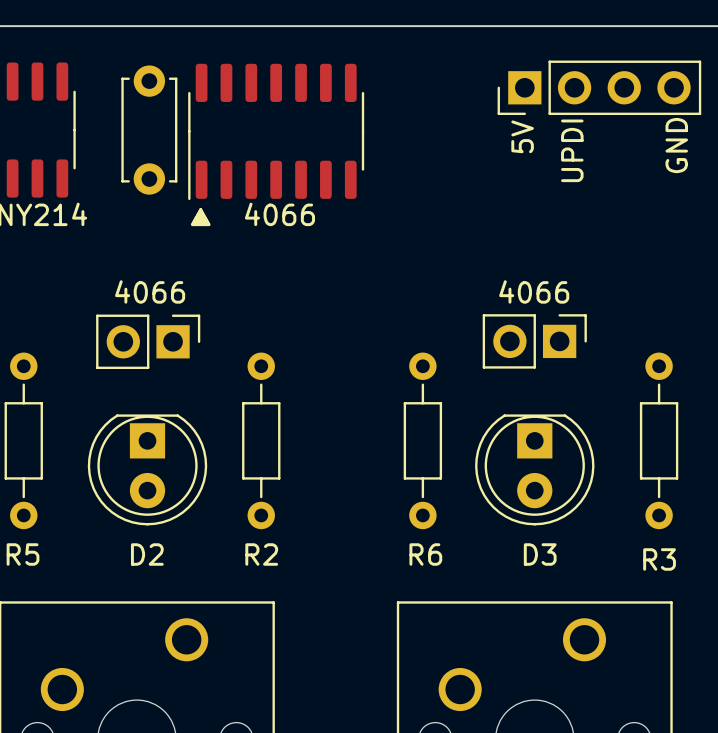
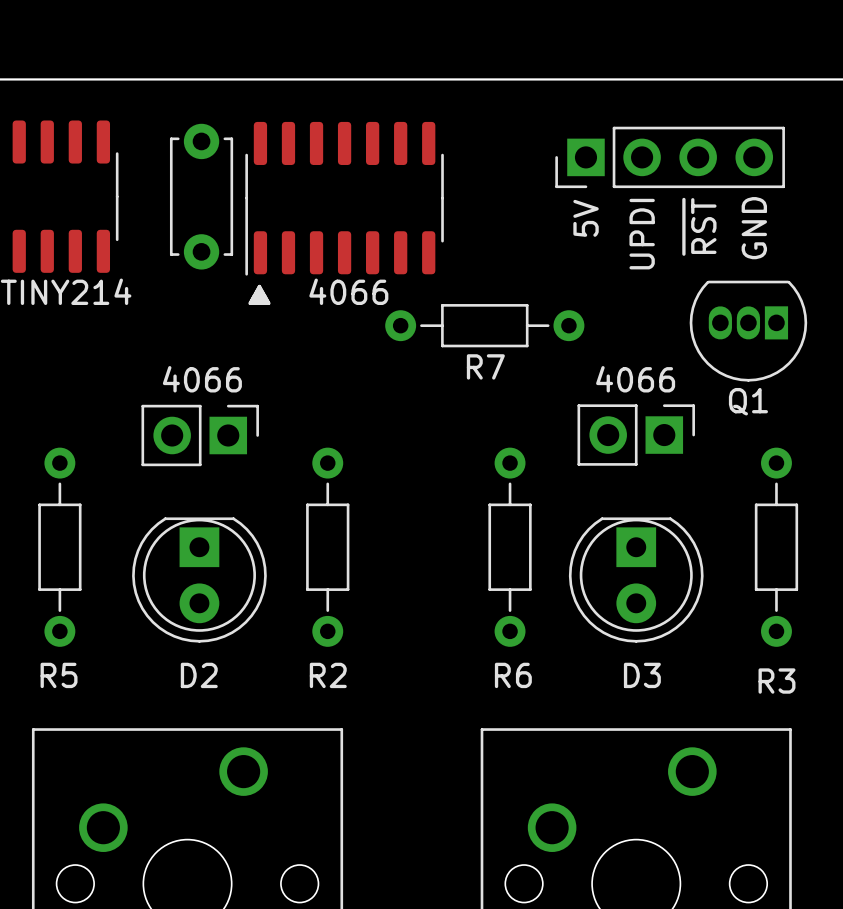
part position: (599, 87) -> (670, 157)
line: none -> (683, 199) (683, 254)
text position: 5V (522, 136) -> 5V (586, 218)
text position: GND (676, 145) -> GND (754, 228)
text position: UPDI (572, 150) -> UPDI (642, 234)
text: none -> RST (703, 226)
R7: none -> (484, 325)
Q1: none -> (748, 331)

